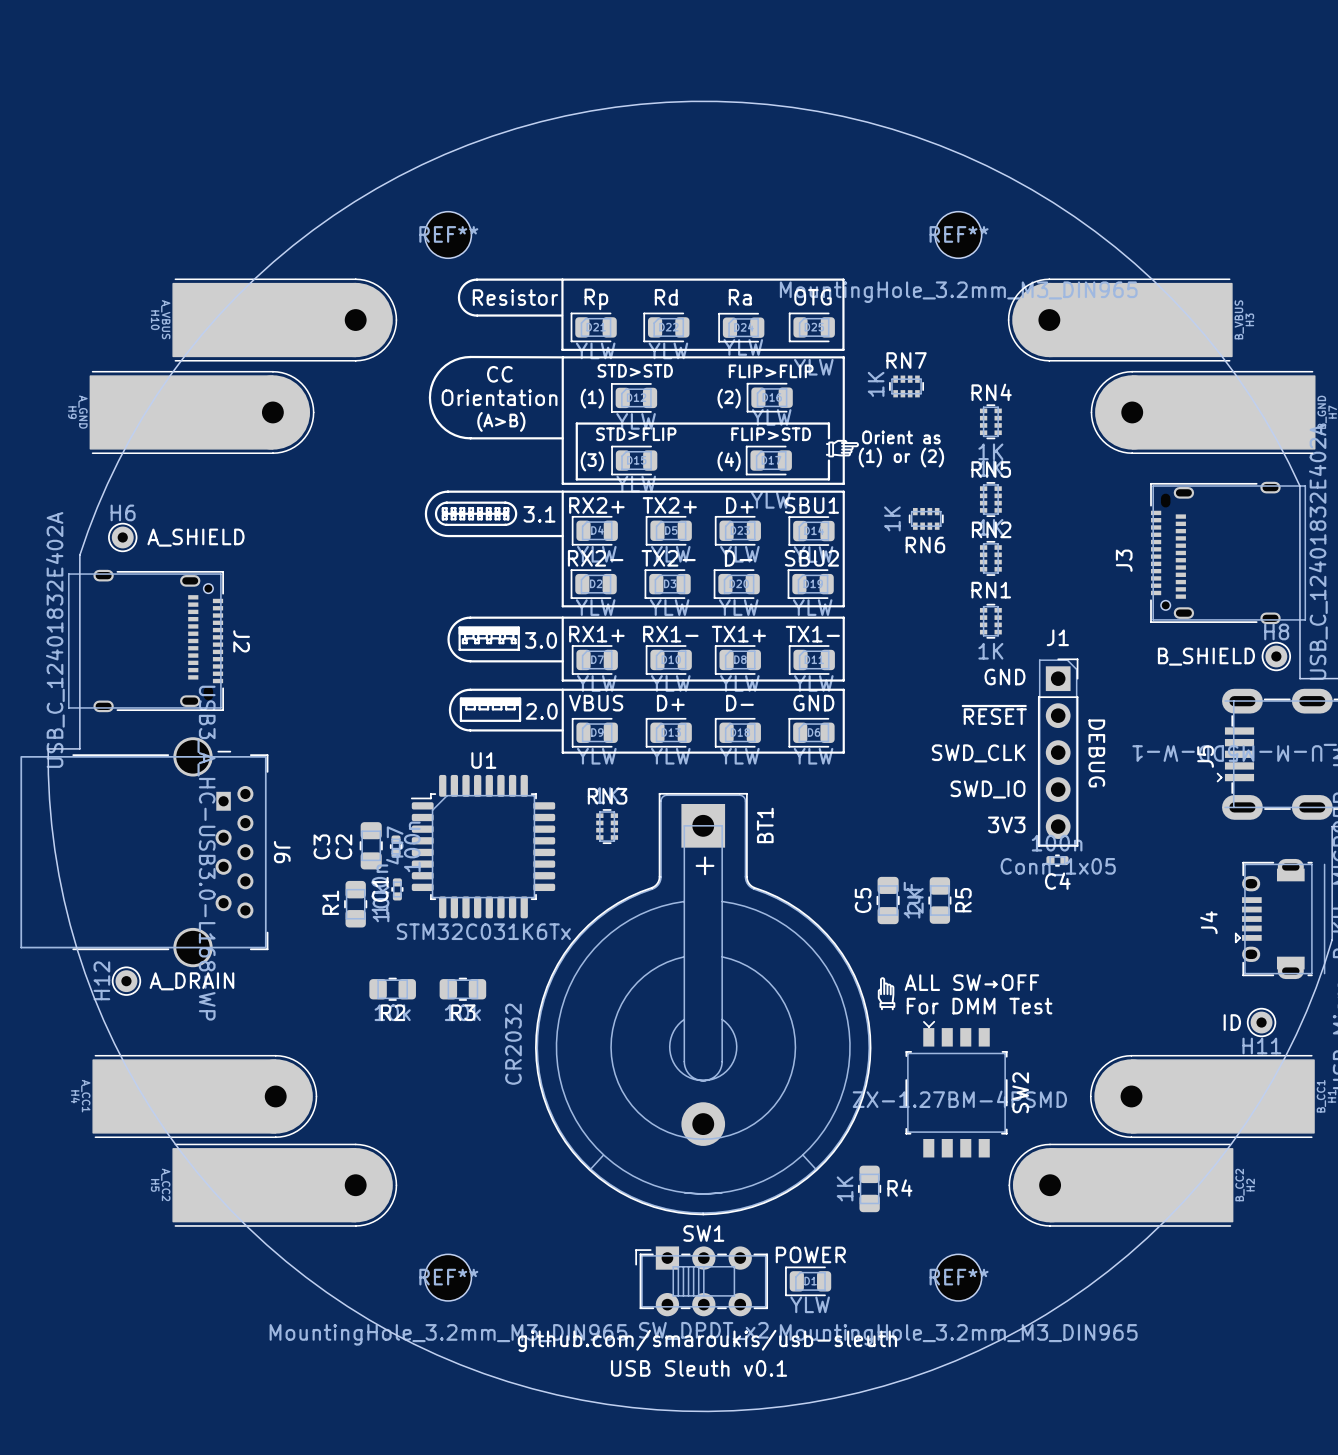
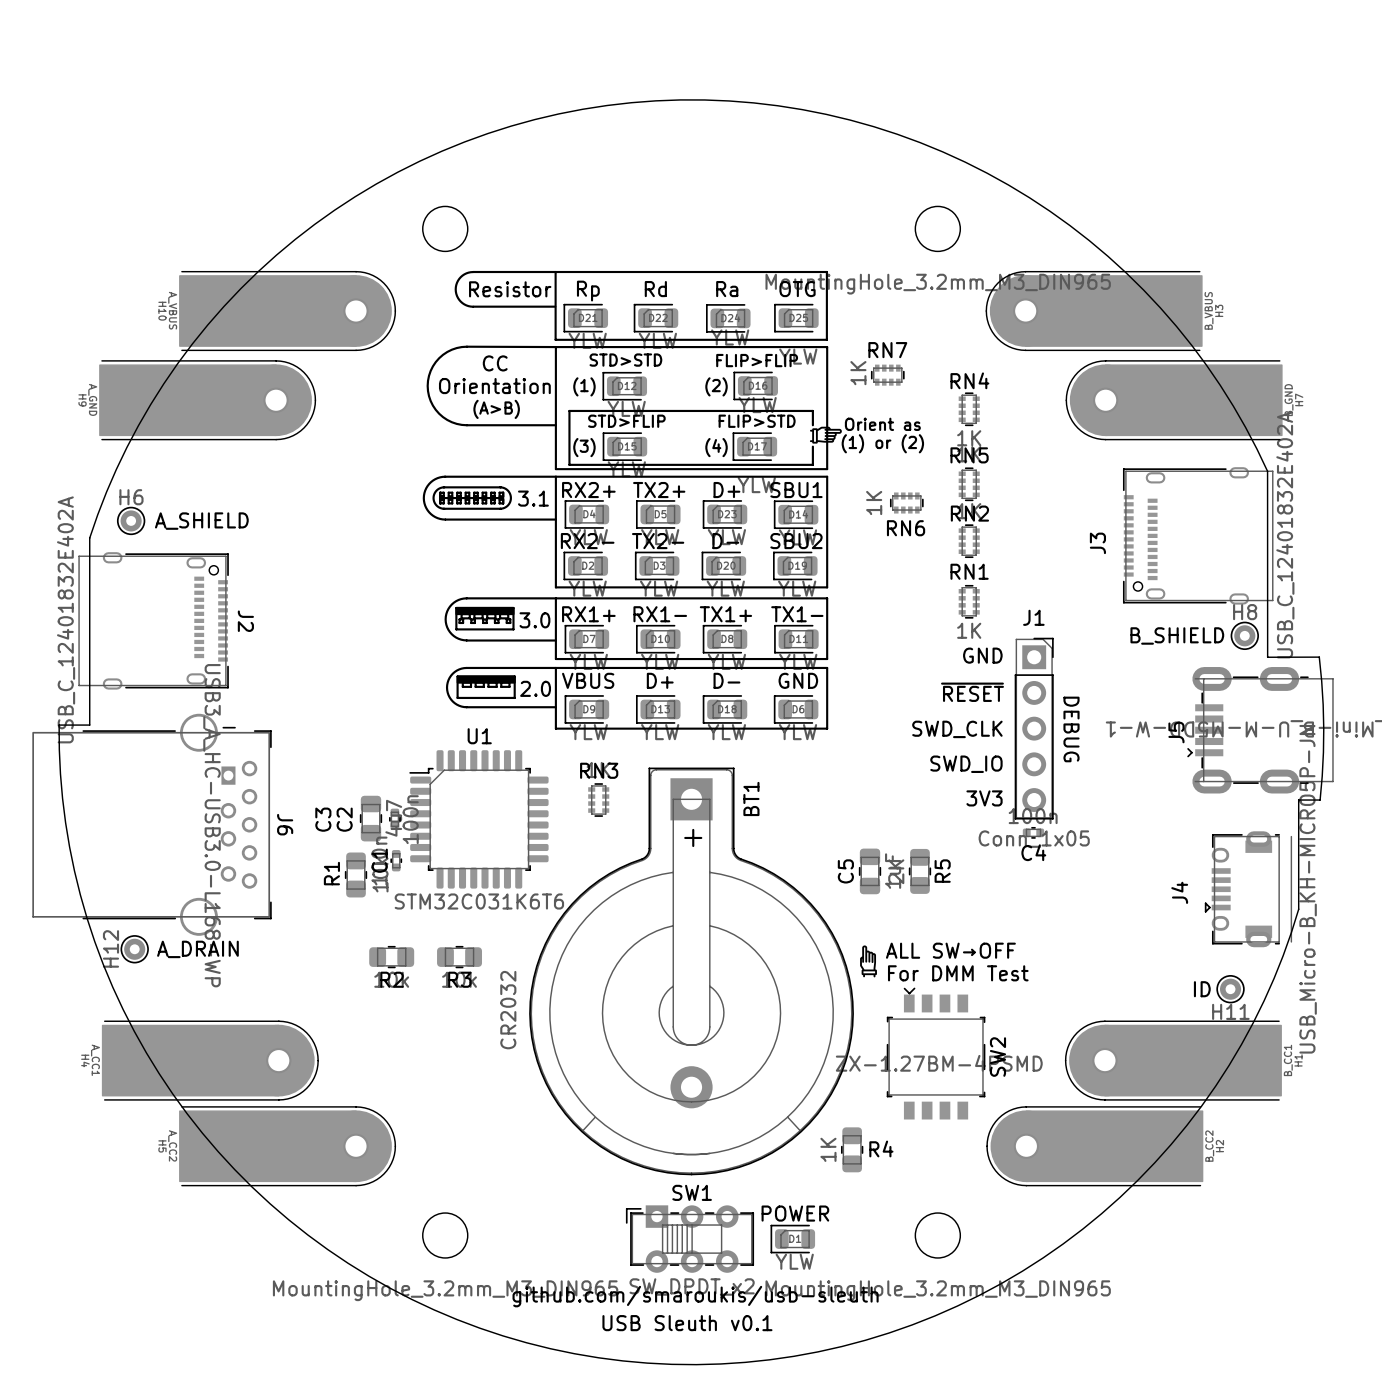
REF** name: REF** (448, 234) -> none
REF** name: REF** (959, 234) -> none
U1 value: STM32C031K6Tx (483, 931) -> STM32C031K6T6 (479, 901)
REF** name: REF** (448, 1277) -> none
REF** name: REF** (959, 1277) -> none

